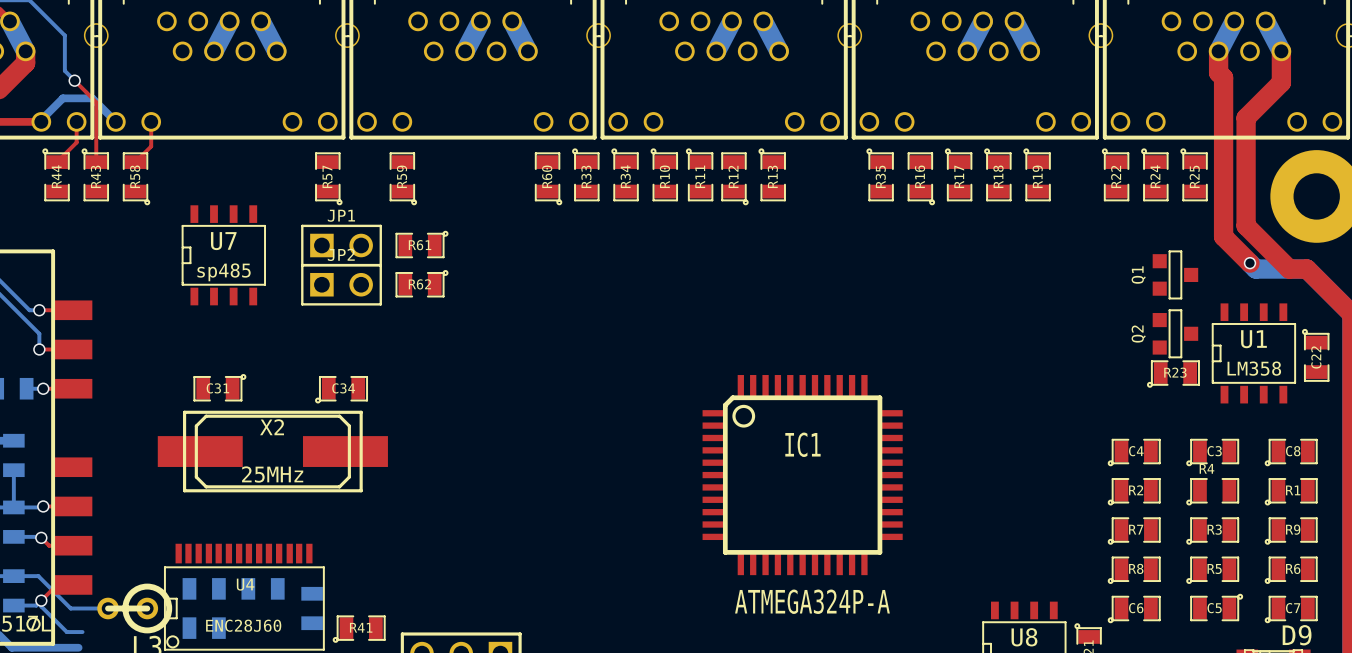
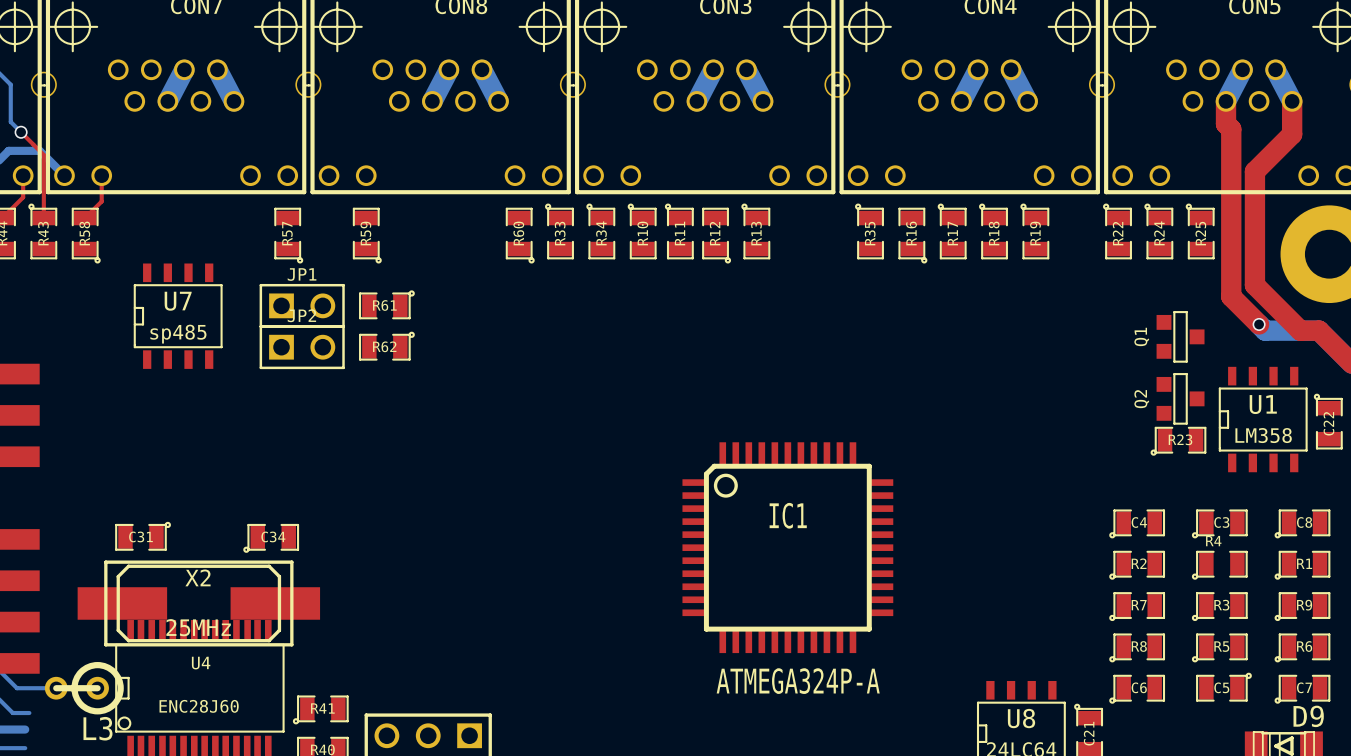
C31 position: (219, 387) -> (143, 536)
C34 position: (341, 389) -> (271, 538)
X2 position: (272, 451) -> (198, 603)
part: (204, 588) -> none
part: (263, 588) -> none
part: (312, 608) -> none
part: (204, 628) -> none

